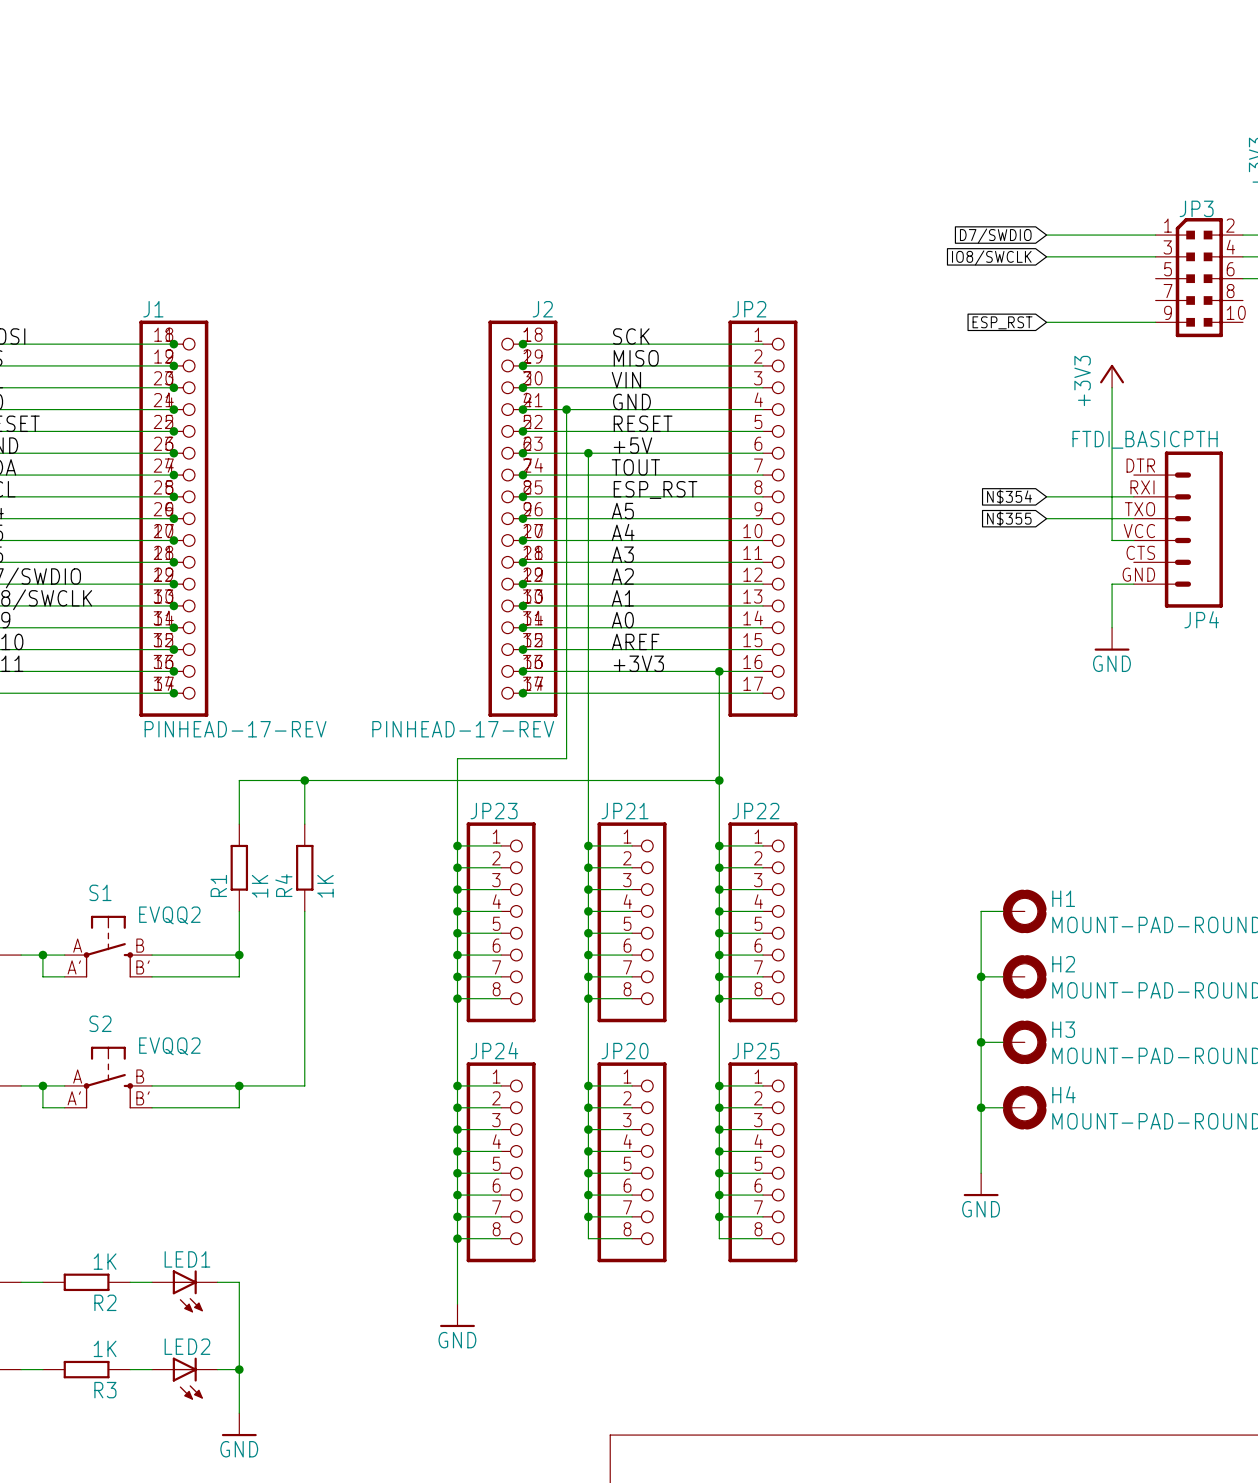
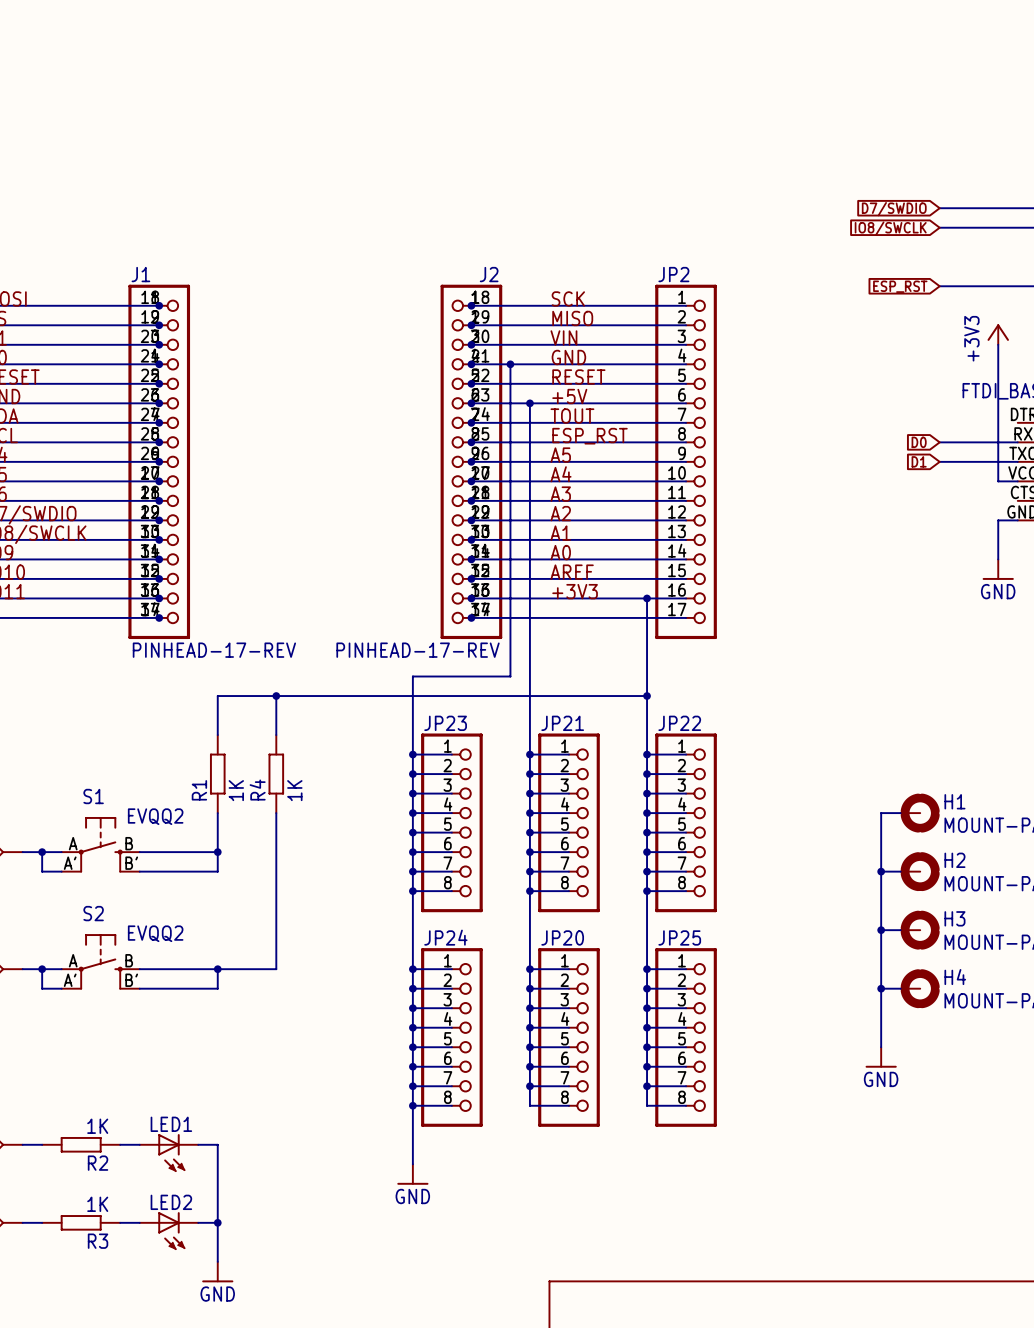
global label: N$354 (1009, 496) -> D0 (919, 442)
global label: N$355 (1009, 518) -> D1 (919, 461)

